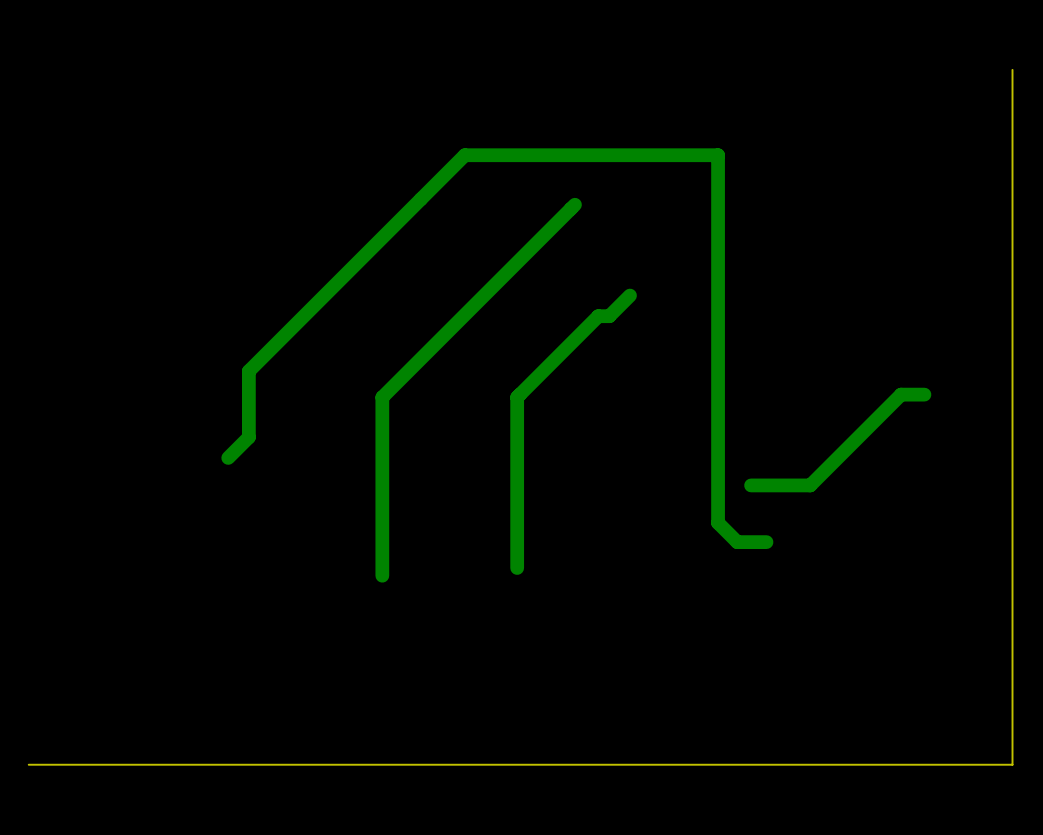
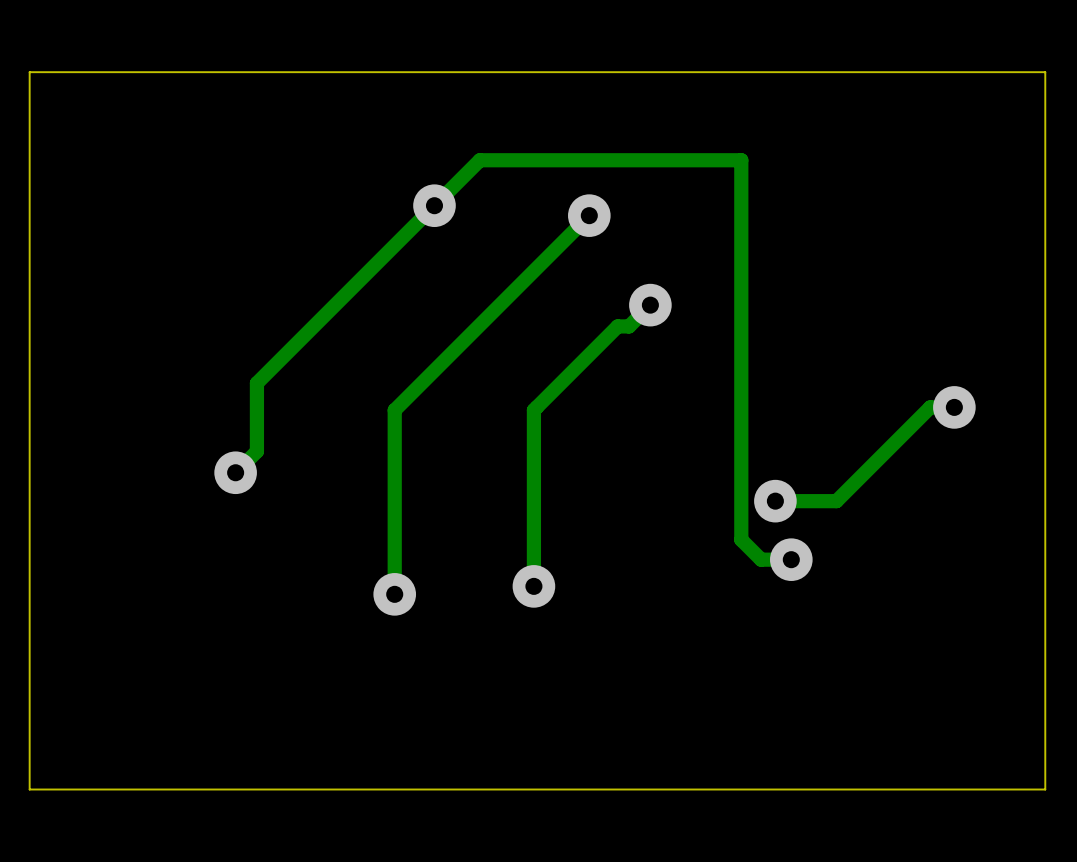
board edge: none -> (1045, 72) (29, 72) (29, 789)
via: none -> (434, 205)
via: none -> (589, 215)
via: none -> (650, 305)
via: none -> (954, 407)
via: none -> (235, 472)
via: none -> (775, 501)
via: none -> (791, 559)
via: none -> (533, 586)
via: none -> (394, 594)

